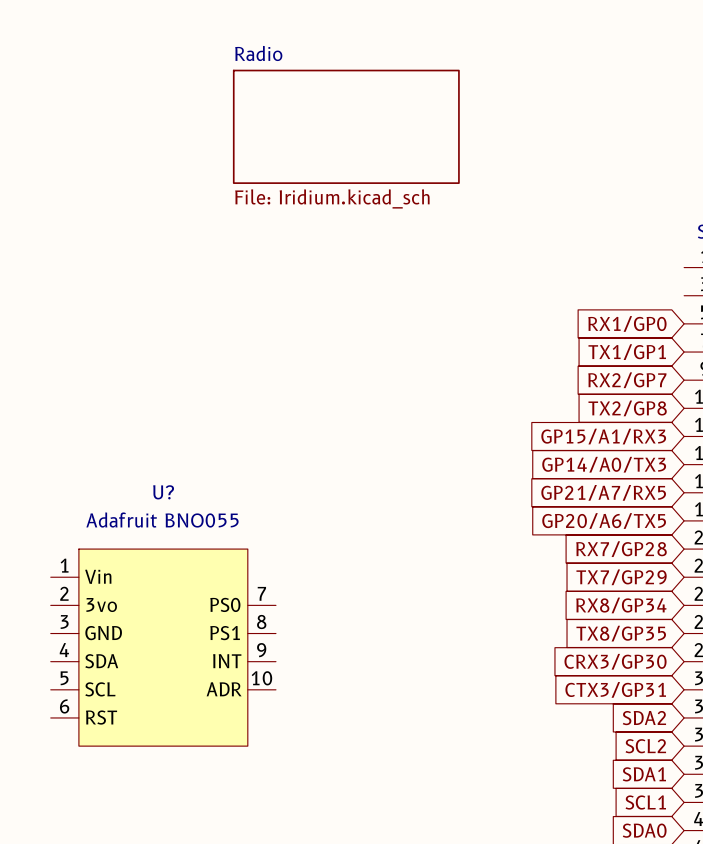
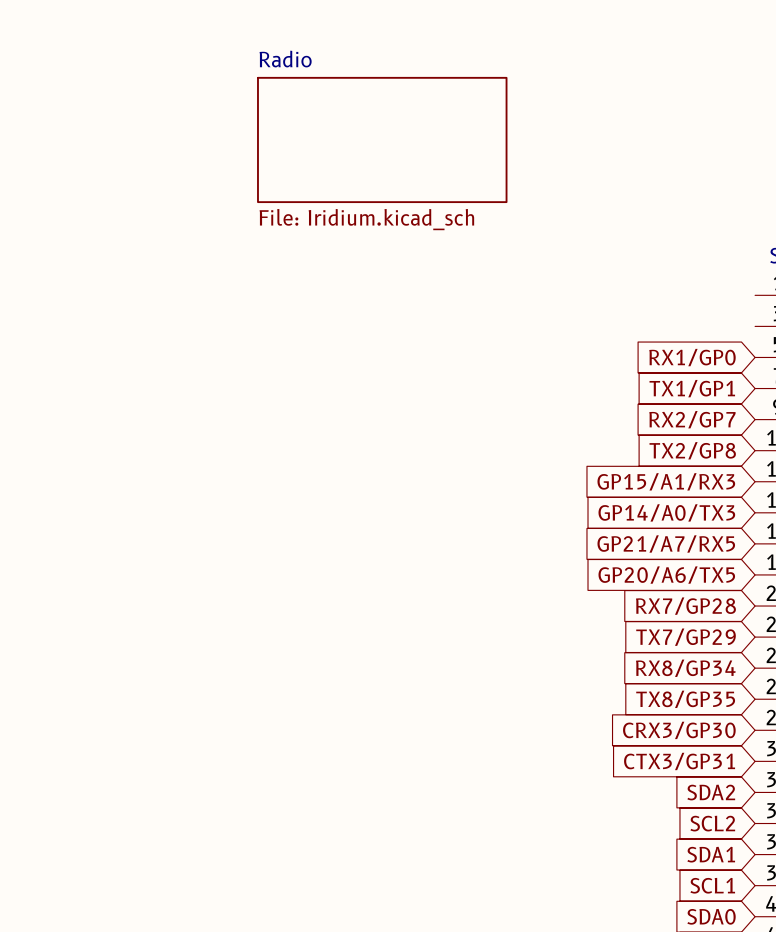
U?: Adafruit BNO055 (163, 647) -> none

